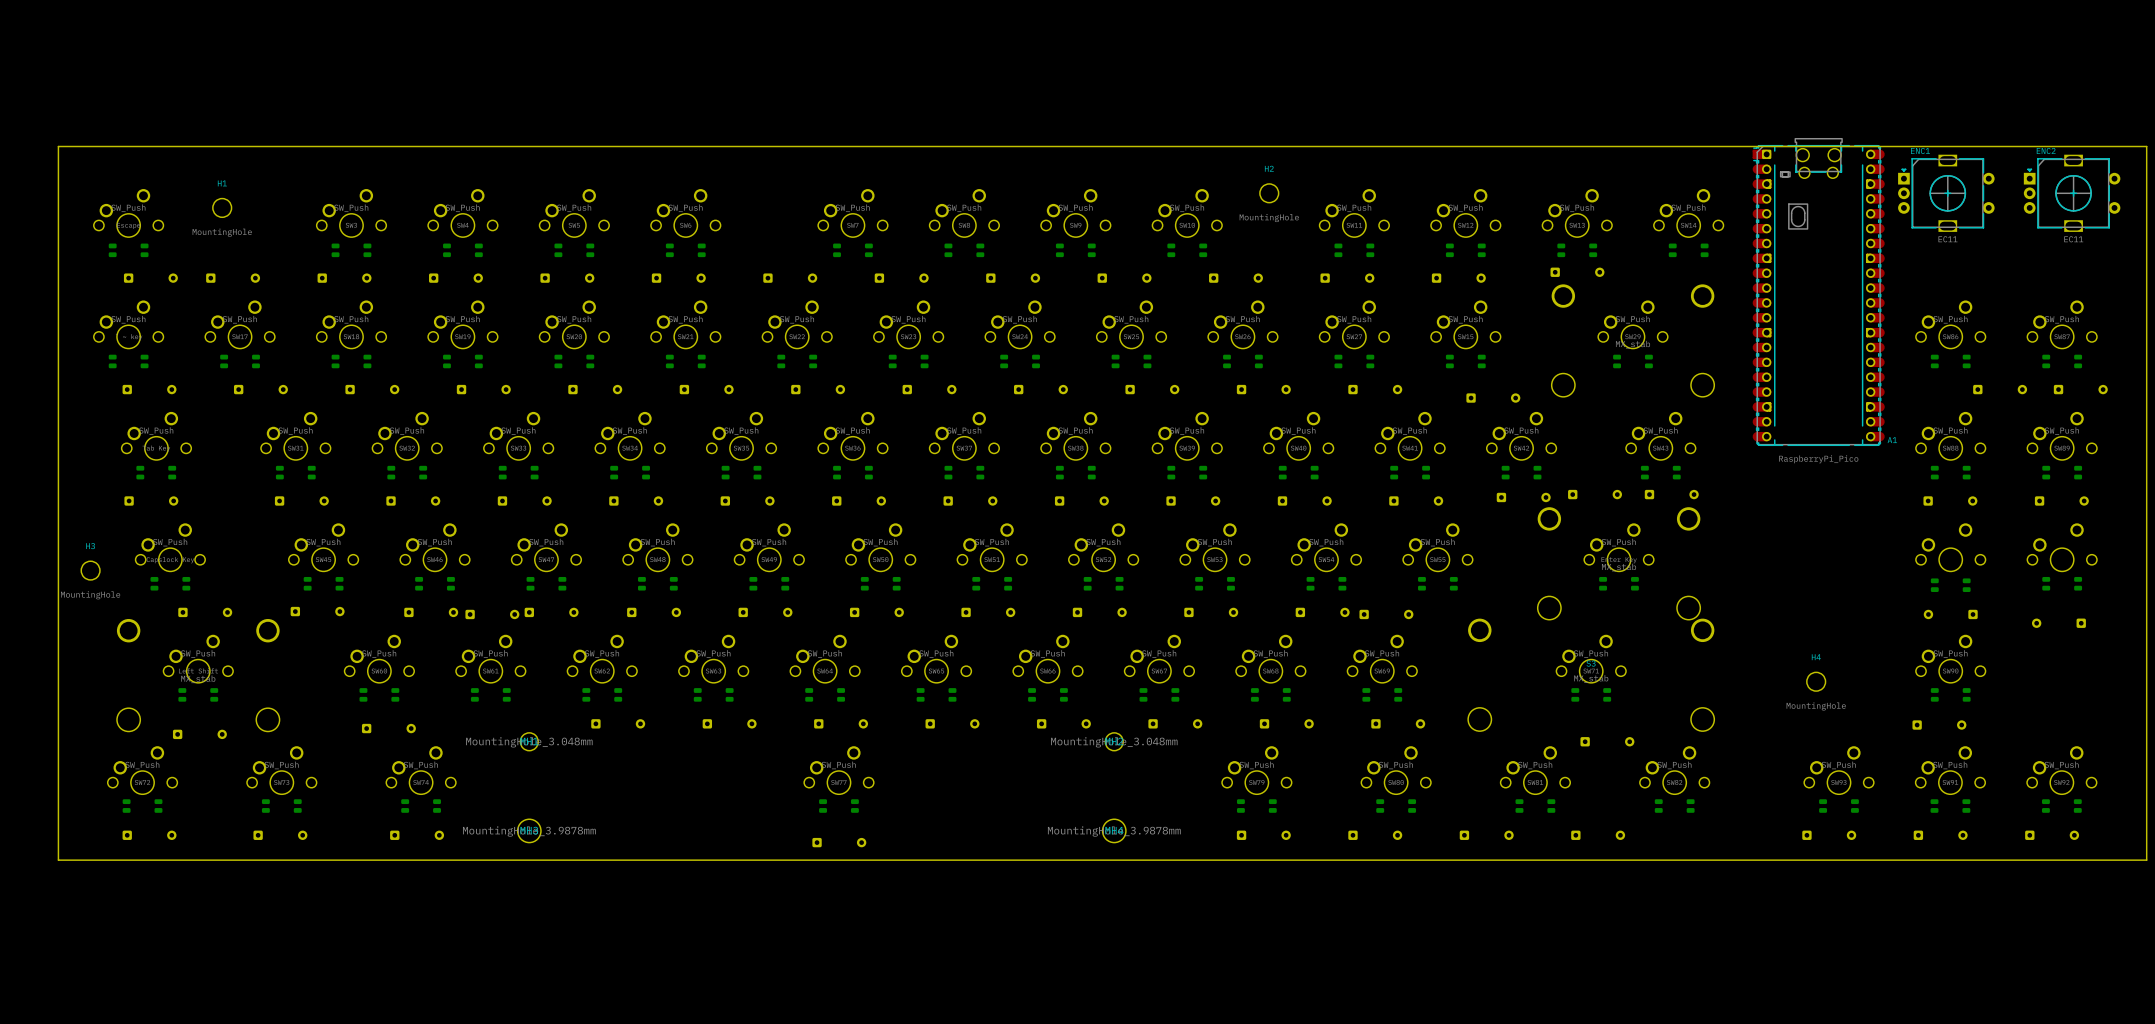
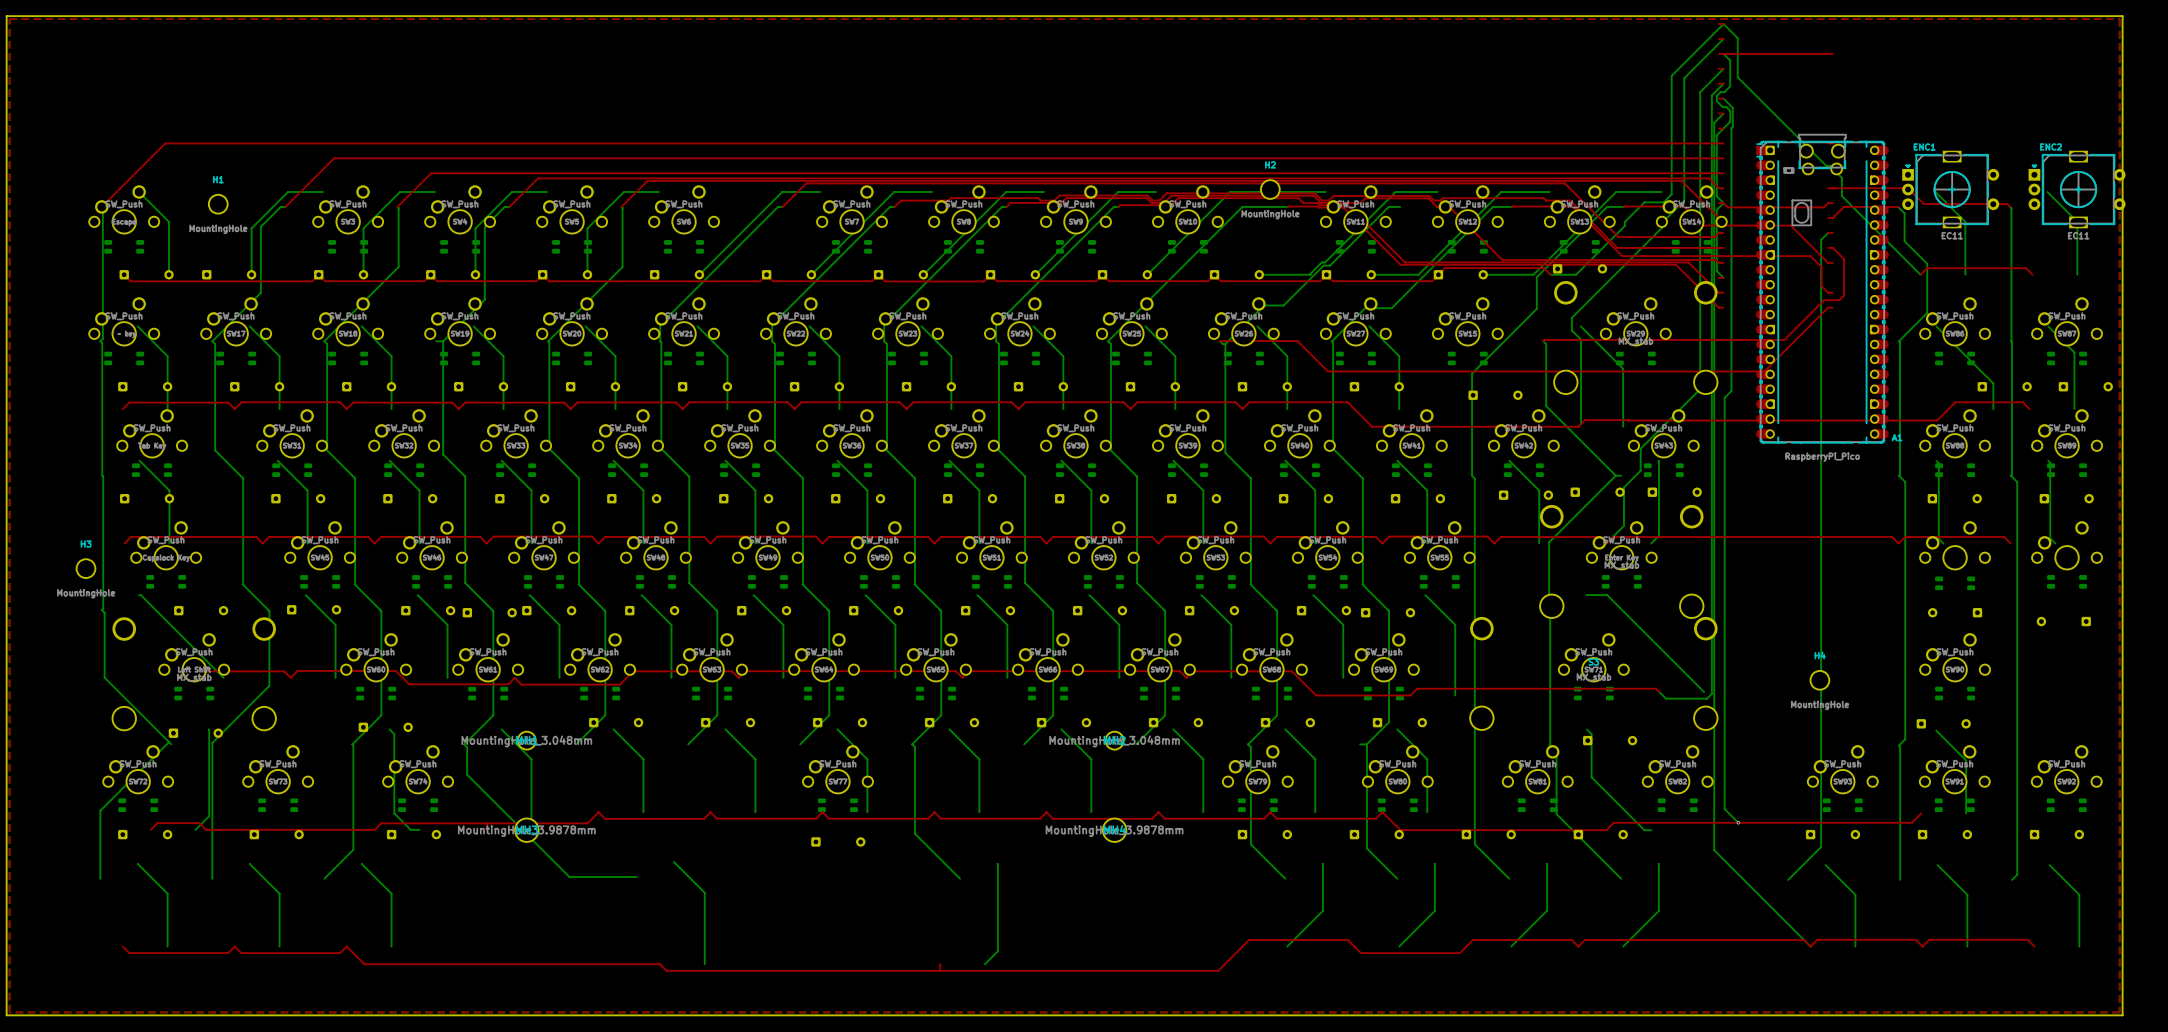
top zone outline: none -> (9, 19) (2119, 19) (2119, 1012) (9, 1012) (9, 19)
top track: none -> (1718, 24) (1723, 24)
top track: none -> (1718, 38) (1723, 38)
bottom track: none -> (1723, 38) (1684, 78) (1684, 200) (1662, 222) (1662, 227) (1571, 317) (1571, 330) (1581, 339) (1581, 424) (1578, 426)
top track: none -> (1718, 53) (1832, 53)
bottom track: none -> (1723, 53) (1730, 60) (1730, 86) (1716, 96) (1716, 101) (1730, 110) (1730, 121) (1716, 135) (1716, 196) (1723, 203) (1716, 209) (1716, 271) (1723, 277)
top track: none -> (1718, 68) (1723, 68)
bottom track: none -> (1723, 68) (1700, 92) (1700, 389) (1640, 448) (1640, 470) (1623, 487) (1623, 525) (1606, 543)
top track: none -> (1718, 83) (1723, 83)
bottom track: none -> (1723, 83) (1711, 95) (1711, 693) (1707, 698) (1665, 698) (1659, 692)
top track: none -> (1718, 98) (1723, 98)
bottom track: none -> (1723, 98) (1732, 107) (1731, 391) (1724, 397) (1724, 809) (1738, 822)
top track: none -> (1718, 113) (1723, 113)
bottom track: none -> (1723, 113) (1714, 122) (1714, 850) (1810, 946)
top track: none -> (1718, 128) (1723, 128)
board edge: (58, 146) (2146, 146) (2146, 860) (58, 860) (58, 146) -> (6, 16) (6, 1015) (2122, 1015) (2122, 16) (6, 16)
top track: none -> (1723, 143) (165, 143) (101, 206)
top track: none -> (1828, 143) (1832, 143)
top track: none -> (1723, 158) (334, 158) (285, 206)
top track: none -> (1723, 173) (431, 173) (397, 206)
top track: none -> (1723, 188) (1718, 188) (1709, 178) (538, 178) (509, 206)
top track: none -> (1828, 188) (1908, 188) (1923, 204) (2007, 204) (2010, 206)
bottom track: none -> (139, 192) (168, 221) (168, 274)
bottom track: none -> (322, 192) (287, 192) (251, 228) (251, 274)
bottom track: none -> (434, 192) (399, 192) (363, 228) (363, 274)
bottom track: none -> (546, 192) (511, 192) (475, 228) (475, 274)
bottom track: none -> (658, 192) (623, 192) (587, 228) (587, 274)
bottom track: none -> (820, 192) (782, 192) (699, 274)
bottom track: none -> (932, 192) (894, 192) (811, 274)
bottom track: none -> (1043, 192) (1006, 192) (923, 274)
bottom track: none -> (1155, 192) (1118, 192) (1035, 274)
bottom track: none -> (1325, 192) (1230, 192) (1147, 274)
bottom track: none -> (1437, 192) (1395, 192) (1310, 274) (1259, 274)
bottom track: none -> (1549, 192) (1501, 192) (1418, 274) (1371, 274)
bottom track: none -> (1661, 192) (1616, 192) (1533, 274) (1483, 274)
bottom track: none -> (1935, 192) (1965, 221) (1965, 274)
bottom track: none -> (2047, 192) (2077, 221) (2077, 274)
top track: none -> (1718, 203) (1723, 203) (1727, 207) (1823, 207) (1828, 203) (1832, 203)
bottom track: none -> (101, 206) (101, 610) (104, 612) (104, 677) (169, 742)
bottom track: none -> (285, 206) (280, 206) (260, 226) (260, 292) (212, 341) (215, 344) (215, 450) (243, 478) (243, 584) (269, 611) (269, 685) (212, 742) (212, 878)
bottom track: none -> (397, 206) (398, 267) (324, 341) (327, 344) (327, 450) (355, 478) (355, 584) (381, 611) (381, 715) (352, 744) (353, 849) (324, 878)
bottom track: none -> (509, 206) (504, 206) (484, 226) (484, 299) (443, 341)
top track: none -> (621, 206) (647, 180) (1681, 180) (1718, 218) (1723, 218)
bottom track: none -> (621, 206) (622, 267) (548, 341) (549, 448) (579, 478) (579, 584) (605, 611) (605, 715) (576, 744)
top track: none -> (782, 206) (806, 183) (1564, 183) (1618, 236) (1714, 236) (1718, 233) (1723, 233)
bottom track: none -> (782, 206) (778, 206) (660, 324) (661, 448) (689, 476) (689, 583) (717, 611) (717, 715) (688, 744)
top track: none -> (894, 206) (901, 200) (948, 200) (951, 198) (1038, 198) (1040, 200) (1054, 200) (1059, 195) (1147, 195) (1152, 200) (1159, 200) (1166, 193) (1314, 193) (1322, 200) (1329, 200) (1333, 196) (1429, 196) (1433, 200) (1441, 200) (1443, 198) (1543, 198) (1545, 200) (1570, 200) (1617, 247) (1723, 247)
bottom track: none -> (894, 206) (889, 206) (772, 324) (772, 341) (775, 344) (775, 450) (803, 478) (803, 584) (829, 611) (829, 715) (800, 744)
top track: none -> (1006, 206) (1010, 202) (1061, 202) (1066, 198) (1146, 198) (1151, 202) (1164, 202) (1171, 195) (1313, 195) (1321, 202) (1360, 202) (1365, 198) (1428, 198) (1437, 206) (1449, 206) (1502, 260) (1716, 260) (1718, 262) (1723, 262)
bottom track: none -> (1006, 206) (1001, 206) (884, 324) (884, 341) (887, 344) (887, 450) (915, 478) (915, 584) (941, 611) (941, 715) (912, 744) (915, 747) (915, 833) (960, 878)
top track: none -> (1118, 206) (1120, 205) (1171, 205) (1178, 198) (1298, 198) (1303, 203) (1347, 205) (1405, 262) (1688, 262) (1718, 292) (1723, 292)
bottom track: none -> (1118, 206) (1113, 206) (996, 324) (996, 341) (998, 344) (998, 450) (1025, 476) (1025, 582) (1053, 611) (1053, 715) (1024, 744)
top track: none -> (1288, 206) (1343, 207) (1400, 264) (1676, 264) (1718, 307) (1723, 307)
bottom track: none -> (1288, 206) (1242, 206) (1108, 341) (1110, 344) (1110, 450) (1137, 476) (1137, 582) (1165, 611) (1165, 715) (1136, 744)
bottom track: none -> (1400, 206) (1388, 206) (1330, 265) (1323, 265) (1283, 305) (1263, 305) (1225, 344)
top track: none -> (1512, 206) (1572, 206) (1622, 256) (1810, 256) (1821, 267) (1821, 286) (1828, 292) (1832, 292)
bottom track: none -> (1512, 206) (1492, 206) (1391, 308) (1365, 308) (1332, 341) (1333, 448) (1362, 478) (1362, 584) (1389, 611) (1389, 722) (1366, 744)
top track: none -> (1624, 206) (1684, 206) (1703, 225) (1790, 225) (1828, 262) (1832, 262)
bottom track: none -> (1624, 206) (1607, 206) (1536, 277) (1536, 308) (1472, 373) (1472, 475) (1474, 478) (1474, 844) (1509, 878)
top track: none -> (1898, 206) (1843, 206) (1832, 218) (1828, 218)
bottom track: none -> (1898, 206) (1904, 213) (1904, 241) (1927, 263) (1927, 313) (1898, 341) (1898, 475) (1905, 481) (1905, 739) (1898, 745) (1900, 879)
bottom track: none -> (2010, 206) (2010, 475) (2017, 481) (2017, 874) (2012, 879)
top track: none -> (1828, 233) (1832, 233)
bottom track: none -> (1828, 233) (1821, 239) (1821, 847) (1788, 879)
top track: none -> (1828, 247) (1832, 247) (1844, 259) (1844, 295) (1839, 300) (1824, 300) (1784, 339) (1543, 341)
top track: none -> (124, 274) (130, 281) (312, 281) (318, 274) (325, 281) (424, 281) (430, 274) (437, 281) (536, 281) (542, 274) (549, 281) (760, 281) (766, 274) (773, 281) (872, 281) (878, 274) (885, 281) (983, 281) (990, 274) (997, 281) (1096, 281) (1102, 274) (1109, 281) (1208, 281) (1214, 274) (1220, 281) (1320, 281) (1326, 274) (1332, 281) (1431, 281) (1445, 268) (1543, 268) (1550, 274)
bottom track: none -> (1550, 274) (1575, 274) (1625, 225) (1625, 221) (1644, 202) (1663, 202) (1671, 194) (1671, 75) (1723, 24) (1737, 38) (1737, 77) (1826, 165) (1829, 165) (1842, 178) (1842, 196) (1920, 274)
top track: none -> (1920, 274) (1927, 268) (2026, 268) (2032, 274)
top track: none -> (1718, 277) (1723, 277)
top track: none -> (1832, 307) (1828, 307) (1764, 371) (1328, 371) (1297, 340) (1220, 341)
bottom track: none -> (137, 326) (167, 356) (167, 409)
bottom track: none -> (249, 326) (279, 356) (279, 409)
bottom track: none -> (361, 326) (391, 356) (391, 409)
bottom track: none -> (473, 326) (503, 356) (503, 409)
bottom track: none -> (585, 326) (615, 356) (615, 409)
bottom track: none -> (697, 326) (727, 356) (727, 409)
bottom track: none -> (809, 326) (839, 356) (839, 409)
bottom track: none -> (921, 326) (951, 356) (951, 409)
bottom track: none -> (1033, 326) (1063, 356) (1063, 409)
bottom track: none -> (1145, 326) (1175, 356) (1175, 409)
bottom track: none -> (1257, 326) (1287, 356) (1287, 409)
bottom track: none -> (1369, 326) (1399, 356) (1399, 409)
bottom track: none -> (1580, 326) (1623, 368) (1623, 426)
bottom track: none -> (1936, 326) (1993, 383) (1993, 409)
bottom track: none -> (2048, 326) (2074, 352) (2074, 409)
bottom track: none -> (436, 341) (443, 341)
bottom track: none -> (443, 341) (443, 454) (465, 476) (465, 582) (493, 611) (493, 715) (464, 744) (467, 747) (467, 774) (569, 876) (636, 876)
bottom track: none -> (1220, 341) (1225, 344)
bottom track: none -> (1543, 341) (1546, 344) (1546, 406) (1615, 475)
bottom track: none -> (1225, 344) (1225, 452) (1250, 478) (1250, 584) (1277, 611) (1277, 715) (1248, 744) (1250, 747) (1250, 844) (1285, 878)
top track: none -> (122, 409) (129, 402) (228, 402) (234, 409) (241, 402) (339, 402) (346, 409) (353, 402) (452, 402) (458, 409) (465, 402) (564, 402) (570, 409) (577, 402) (676, 402) (682, 409) (689, 402) (787, 402) (794, 409) (801, 402) (899, 402) (906, 409) (913, 402) (1011, 402) (1018, 409) (1025, 402) (1123, 402) (1130, 409) (1137, 402) (1235, 402) (1242, 409) (1249, 402) (1347, 402) (1372, 426) (1578, 426) (1585, 420) (1937, 420) (1955, 402) (2022, 402) (2029, 409)
bottom track: none -> (139, 460) (169, 490) (169, 543)
bottom track: none -> (277, 460) (307, 490) (307, 543)
bottom track: none -> (389, 460) (419, 490) (419, 543)
bottom track: none -> (501, 460) (531, 490) (531, 543)
bottom track: none -> (613, 460) (643, 490) (643, 543)
bottom track: none -> (725, 460) (755, 490) (755, 543)
bottom track: none -> (837, 460) (867, 490) (867, 543)
bottom track: none -> (949, 460) (979, 490) (979, 543)
bottom track: none -> (1061, 460) (1091, 490) (1091, 543)
bottom track: none -> (1173, 460) (1203, 490) (1203, 543)
bottom track: none -> (1285, 460) (1315, 490) (1315, 543)
bottom track: none -> (1397, 460) (1427, 490) (1427, 543)
bottom track: none -> (1509, 460) (1539, 490) (1539, 543)
bottom track: none -> (1658, 460) (1658, 535) (1651, 543)
bottom track: none -> (1936, 460) (1938, 463) (1938, 538) (1943, 543)
bottom track: none -> (2048, 460) (2050, 462) (2050, 538) (2055, 543)
bottom track: none -> (1615, 475) (1549, 542) (1549, 744) (1556, 751) (1556, 814) (1621, 878)
bottom track: none -> (1615, 475) (1621, 475)
top track: none -> (124, 543) (131, 537) (256, 537) (262, 543) (269, 536) (368, 536) (374, 543) (381, 536) (480, 536) (486, 543) (493, 536) (591, 536) (598, 543) (605, 537) (704, 537) (710, 543) (717, 536) (815, 536) (822, 543) (829, 536) (928, 536) (934, 543) (941, 537) (1040, 537) (1046, 543) (1053, 537) (1152, 537) (1158, 543) (1165, 536) (1263, 536) (1270, 543) (1277, 536) (1375, 536) (1382, 543) (1389, 536) (1487, 536) (1494, 543) (1500, 537) (1599, 537) (1606, 543) (1612, 537) (1892, 537) (1898, 543) (1905, 537) (2004, 537) (2010, 543)
bottom track: none -> (139, 595) (223, 677)
bottom track: none -> (305, 595) (335, 624) (335, 677)
bottom track: none -> (417, 595) (447, 624) (447, 677)
bottom track: none -> (529, 595) (559, 624) (559, 677)
bottom track: none -> (641, 595) (671, 624) (671, 677)
bottom track: none -> (753, 595) (783, 624) (783, 677)
bottom track: none -> (865, 595) (895, 624) (895, 677)
bottom track: none -> (977, 595) (1007, 624) (1007, 677)
bottom track: none -> (1089, 595) (1119, 624) (1119, 677)
bottom track: none -> (1201, 595) (1231, 624) (1231, 677)
bottom track: none -> (1313, 595) (1343, 624) (1343, 677)
bottom track: none -> (1425, 595) (1455, 624) (1455, 695)
bottom track: none -> (1586, 595) (1607, 595) (1704, 692)
top track: none -> (178, 677) (185, 671) (284, 671) (290, 677) (297, 670) (395, 670) (409, 684) (508, 684) (514, 677) (521, 684) (619, 684) (633, 671) (732, 671) (738, 677) (745, 671) (955, 671) (962, 677) (969, 671) (1179, 671) (1186, 677) (1192, 671) (1292, 671) (1316, 695) (1410, 695) (1417, 688) (1656, 688) (1659, 692)
bottom track: none -> (208, 729) (209, 816) (195, 829)
bottom track: none -> (389, 729) (394, 734) (394, 813) (410, 829) (419, 829)
bottom track: none -> (501, 729) (531, 759) (531, 829)
bottom track: none -> (613, 729) (643, 759) (643, 812)
bottom track: none -> (725, 729) (755, 759) (755, 812)
bottom track: none -> (837, 729) (867, 759) (867, 812)
bottom track: none -> (949, 729) (979, 759) (979, 812)
bottom track: none -> (1061, 729) (1091, 759) (1091, 812)
bottom track: none -> (1173, 729) (1203, 759) (1203, 812)
bottom track: none -> (1285, 729) (1315, 759) (1315, 812)
bottom track: none -> (1397, 729) (1427, 759) (1427, 812)
bottom track: none -> (1586, 729) (1591, 734) (1591, 777) (1644, 830) (1651, 830)
bottom track: none -> (1936, 730) (1966, 760) (1966, 813)
bottom track: none -> (169, 742) (100, 810) (100, 878)
bottom track: none -> (169, 742) (171, 744)
bottom track: none -> (1360, 744) (1366, 744)
bottom track: none -> (1366, 744) (1366, 848) (1397, 878)
top track: none -> (1921, 813) (1911, 822) (1613, 822) (1606, 830) (1400, 830) (1382, 812) (1375, 818) (1276, 818) (1270, 812) (1263, 818) (1165, 818) (1158, 812) (1151, 818) (1053, 818) (1046, 812) (1040, 818) (941, 818) (934, 812) (928, 818) (829, 818) (822, 812) (816, 818) (717, 818) (710, 812) (703, 818) (605, 818) (598, 812) (587, 823) (381, 823) (374, 829) (206, 829) (199, 823) (157, 823) (150, 829)
via: none -> (1738, 822)
top track: none -> (486, 823) (486, 829)
bottom track: none -> (673, 862) (704, 892) (704, 964)
bottom track: none -> (137, 863) (167, 893) (167, 946)
bottom track: none -> (249, 863) (279, 893) (279, 946)
bottom track: none -> (361, 863) (391, 893) (391, 946)
bottom track: none -> (997, 863) (997, 951) (984, 964)
bottom track: none -> (1322, 863) (1322, 910) (1287, 946)
bottom track: none -> (1434, 863) (1434, 910) (1399, 946)
bottom track: none -> (1546, 863) (1547, 910) (1511, 946)
bottom track: none -> (1658, 863) (1658, 910) (1623, 946)
bottom track: none -> (1825, 864) (1855, 894) (1855, 946)
bottom track: none -> (1937, 864) (1967, 894) (1967, 946)
bottom track: none -> (2049, 864) (2079, 894) (2079, 946)
top track: none -> (122, 946) (129, 953) (228, 953) (234, 946) (241, 953) (340, 953) (346, 946) (364, 964) (659, 964) (666, 970) (1218, 970) (1248, 940) (1347, 940) (1360, 953) (1459, 953) (1472, 940) (1571, 940) (1578, 946) (1584, 940) (1804, 940) (1810, 946) (1817, 939) (1915, 939) (1922, 946) (1929, 939) (2027, 939) (2034, 946)
top track: none -> (940, 964) (940, 970)

